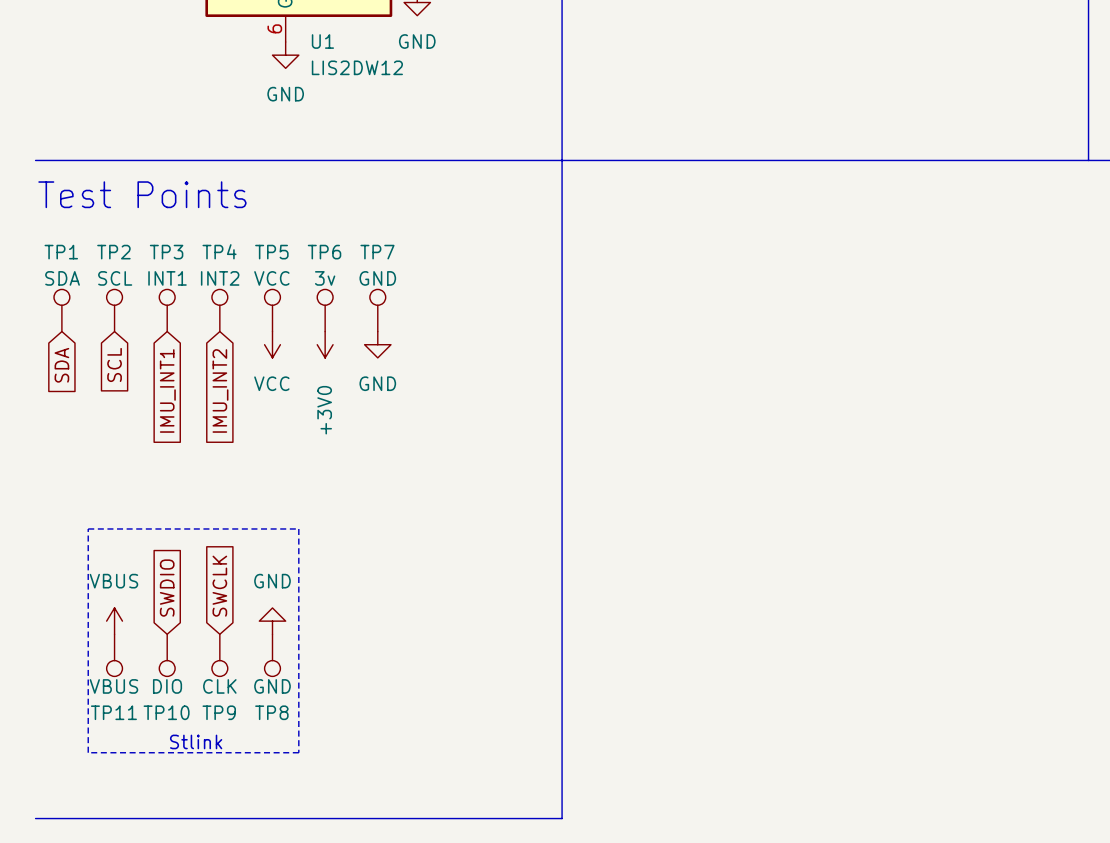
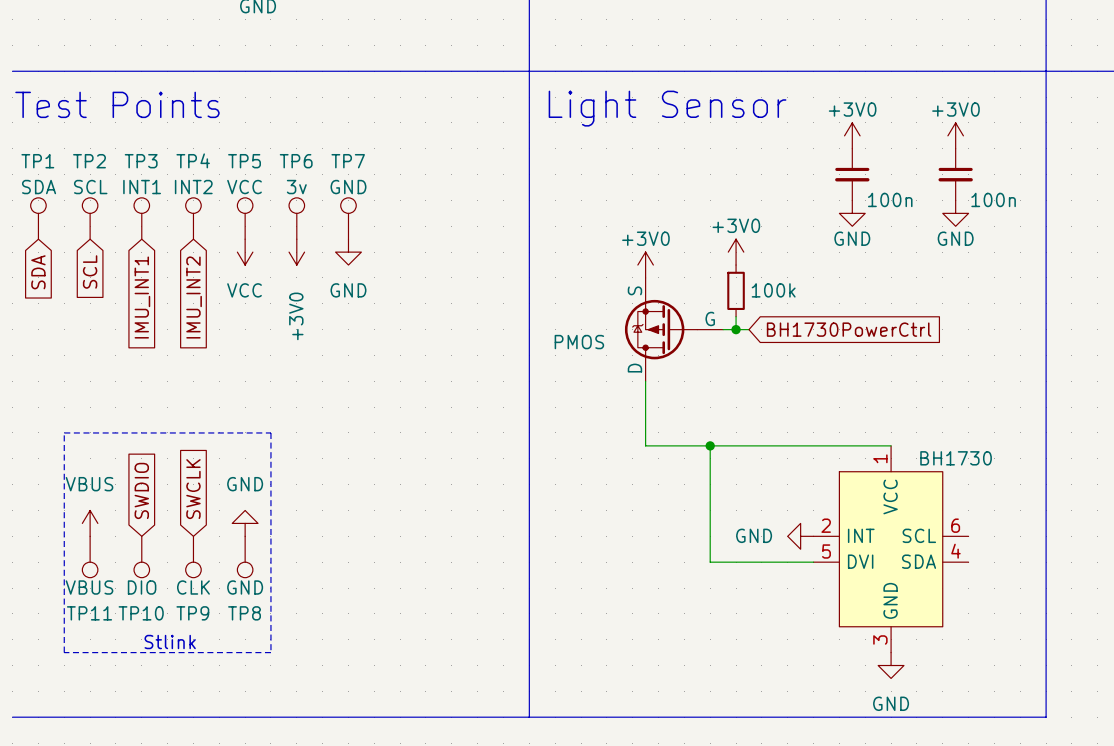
line: none -> (1046, 71) (1046, 717) (529, 717)
text: none -> Light Sensor (667, 108)
power symbol: none -> +3V0 (852, 135)
power symbol: none -> +3V0 (955, 135)
part: none -> 100n (852, 174)
part: none -> 100n (955, 174)
power symbol: none -> GND (852, 213)
power symbol: none -> GND (955, 213)
power symbol: none -> +3V0 (736, 252)
power symbol: none -> +3V0 (645, 265)
part: none -> 100k (736, 290)
wire: none -> (736, 316) (736, 329)
part: none -> PMOS (674, 329)
wire: none -> (723, 329) (748, 329)
junction: none -> (736, 329)
global label: none -> BH1730PowerCtrl (849, 329)
wire: none -> (645, 381) (645, 445) (891, 445)
wire: none -> (710, 445) (710, 562) (813, 562)
junction: none -> (710, 445)
power symbol: none -> GND (800, 536)
part: none -> BH1730 (891, 549)
power symbol: none -> GND (891, 665)

